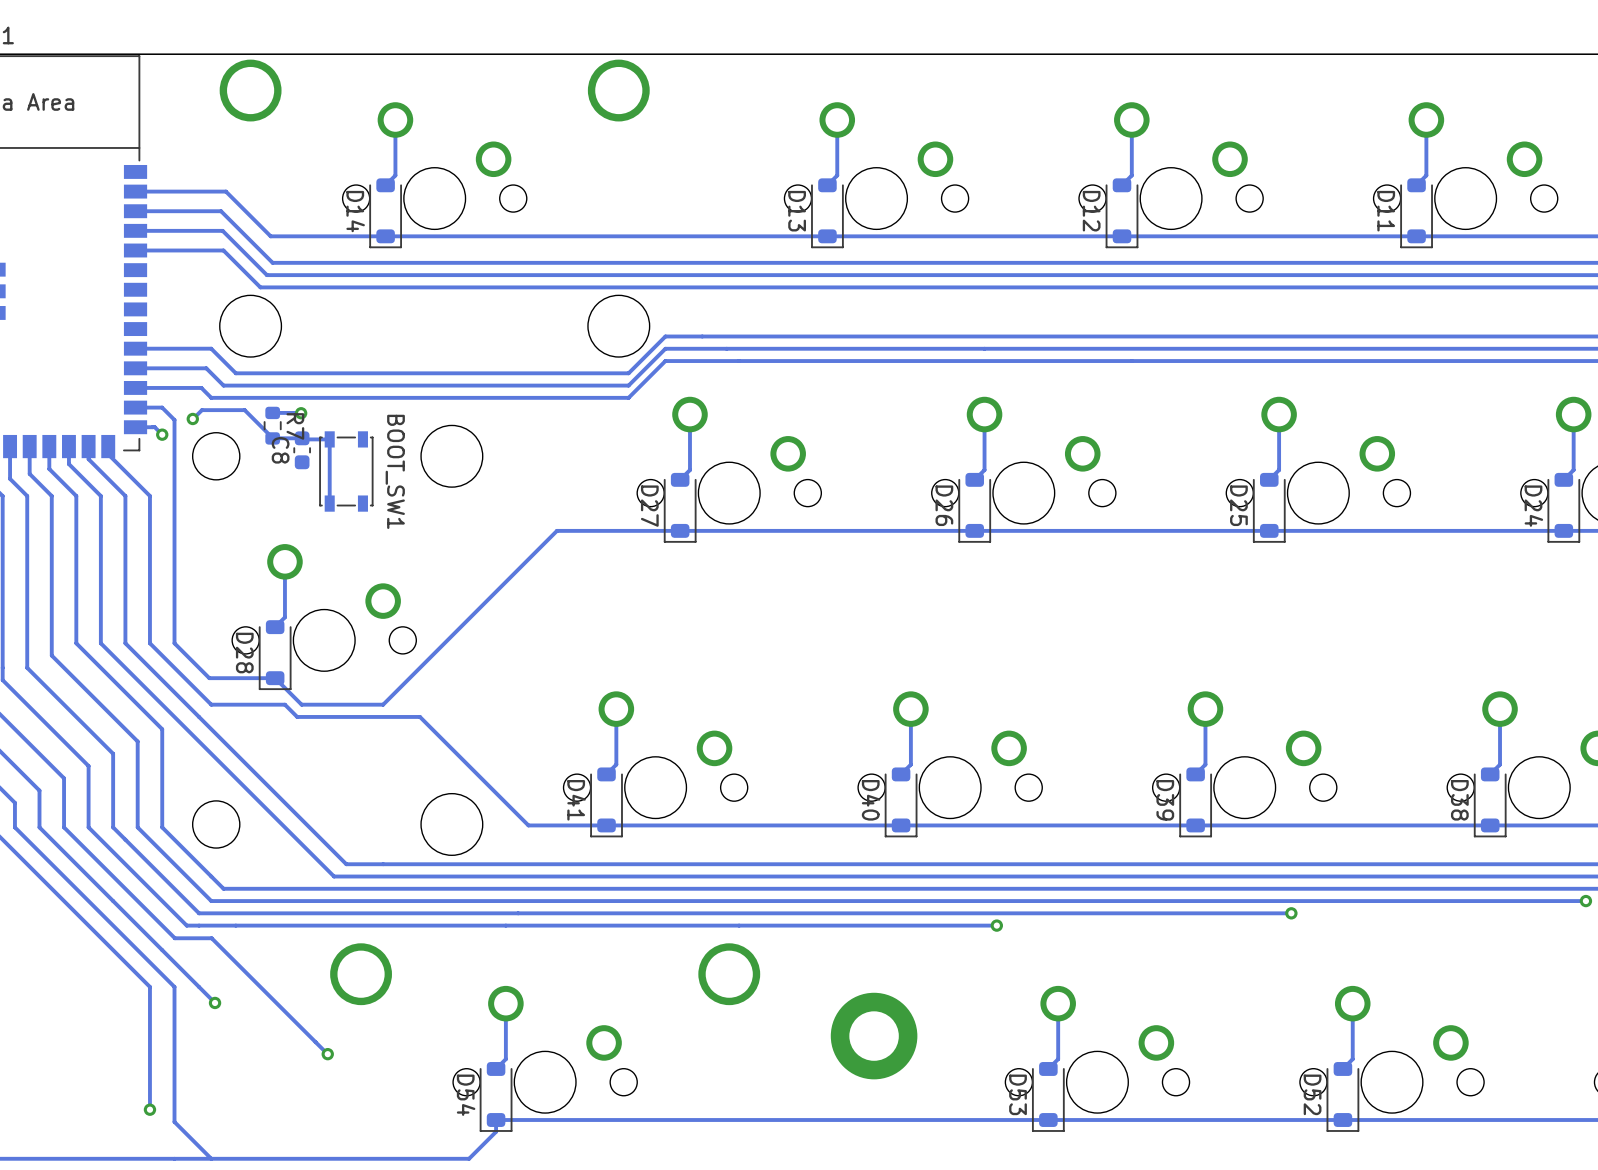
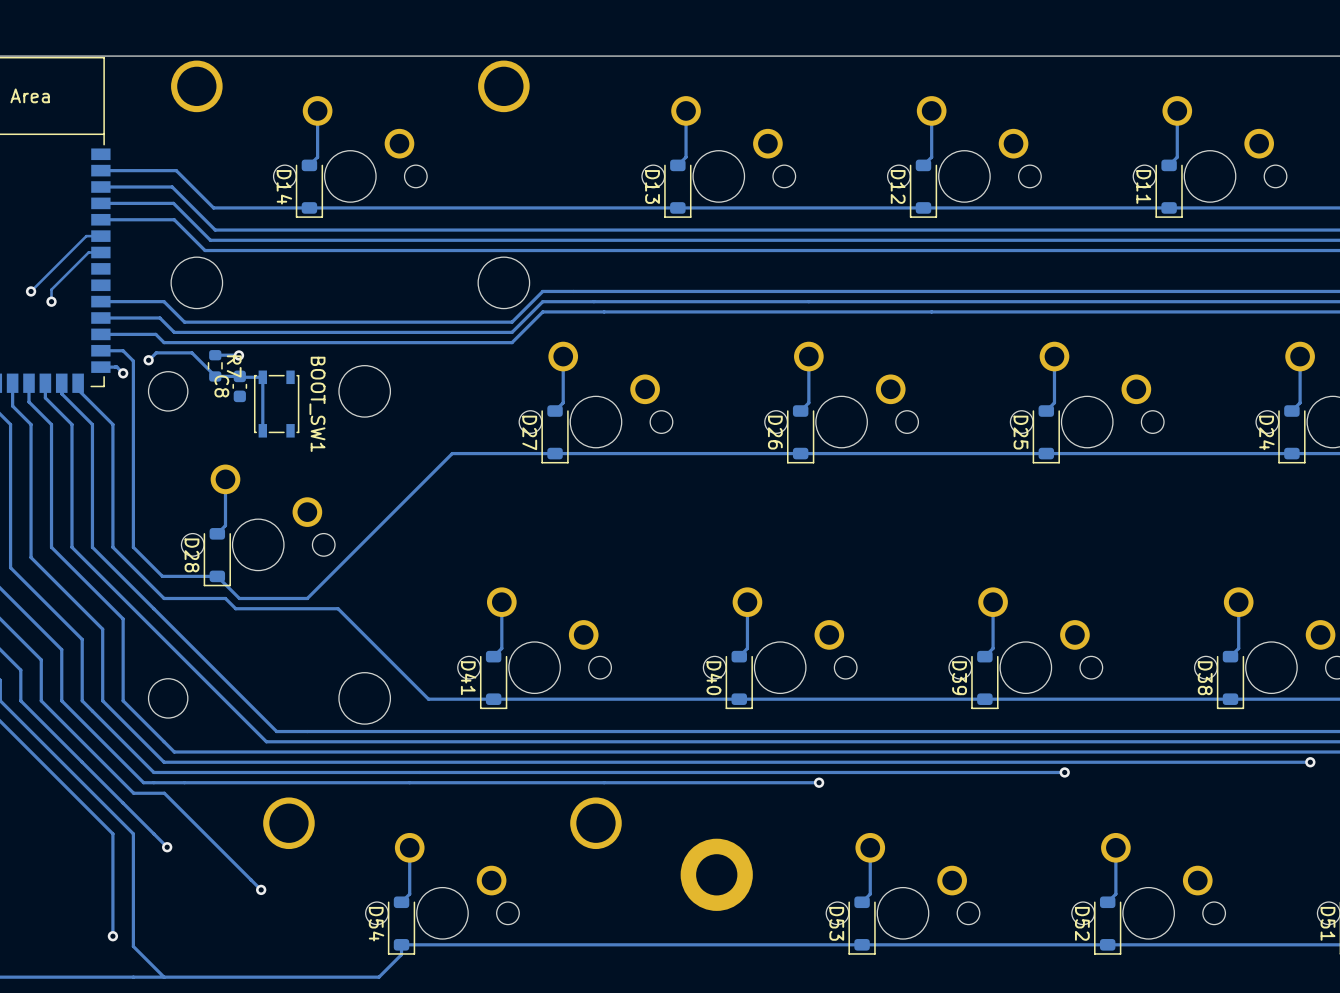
track: none -> (100, 236) (86, 236) (31, 291)
track: none -> (100, 252) (88, 252) (51, 289) (51, 301)
via: none -> (31, 291)
via: none -> (51, 301)

